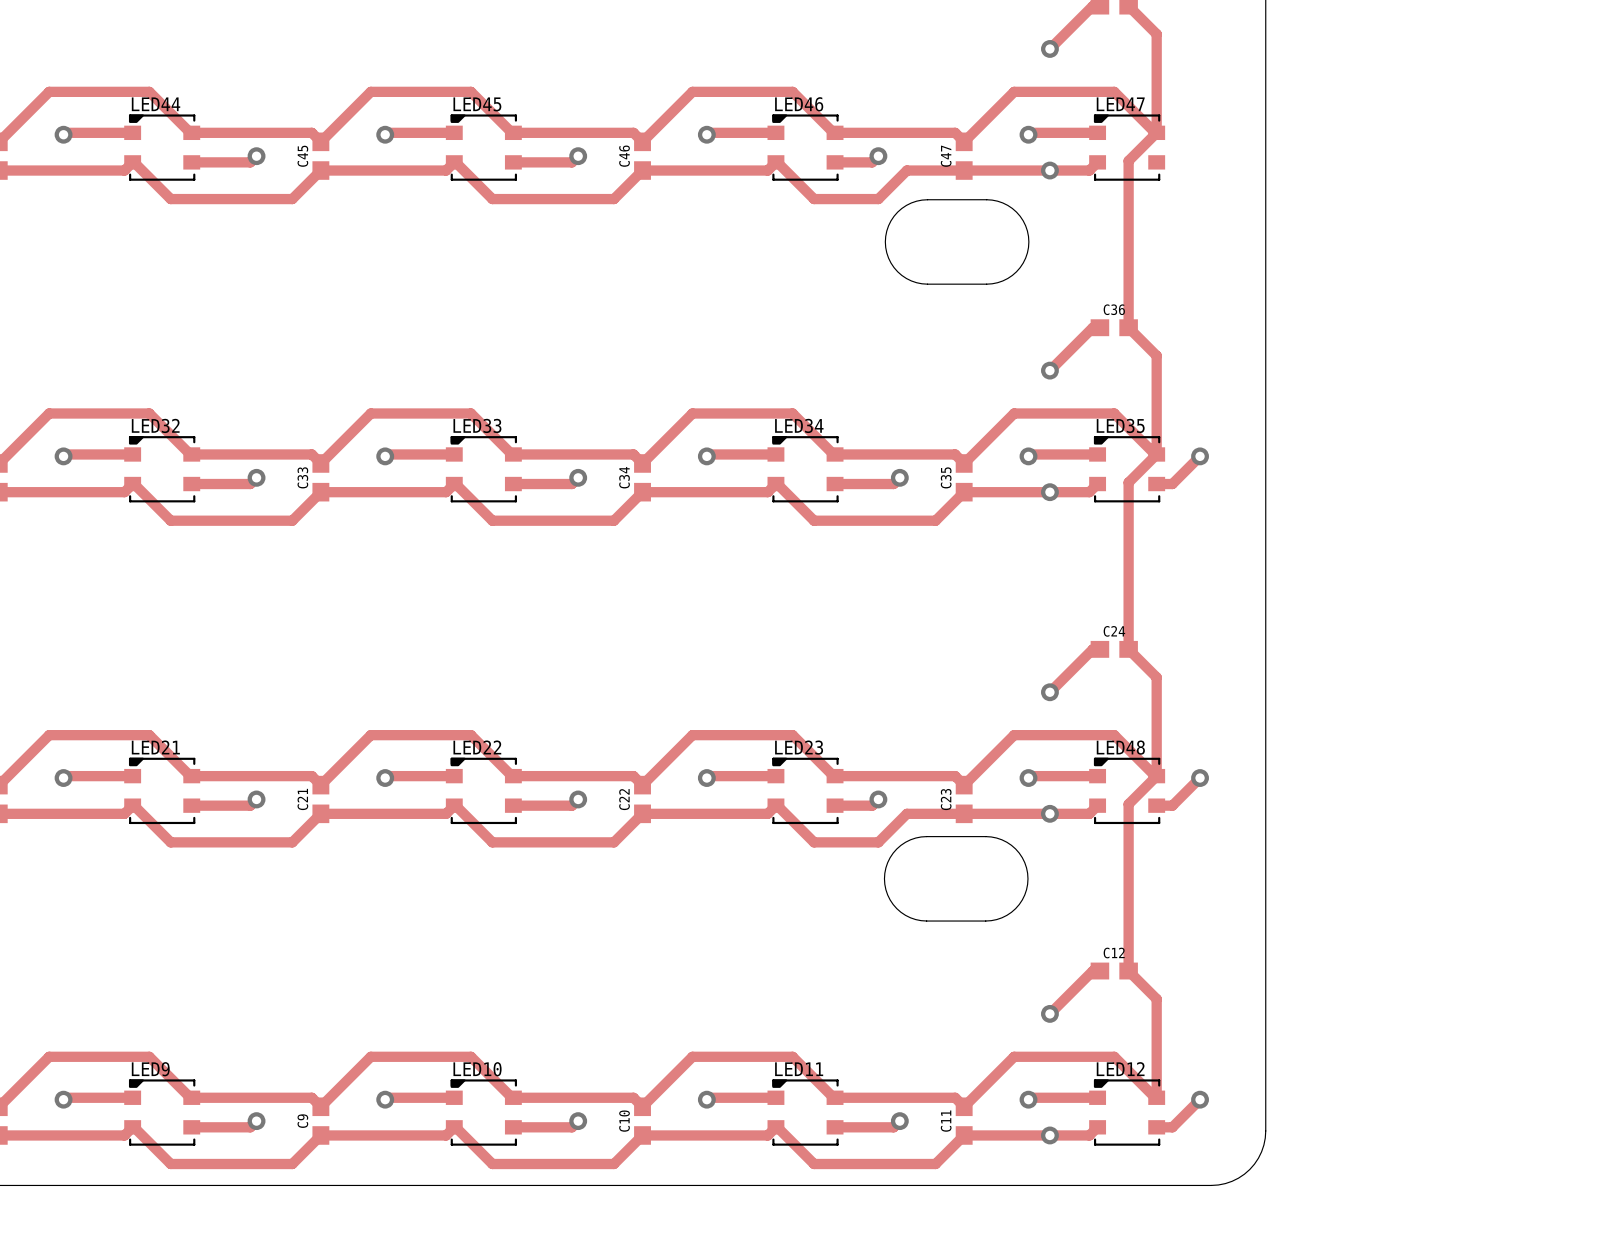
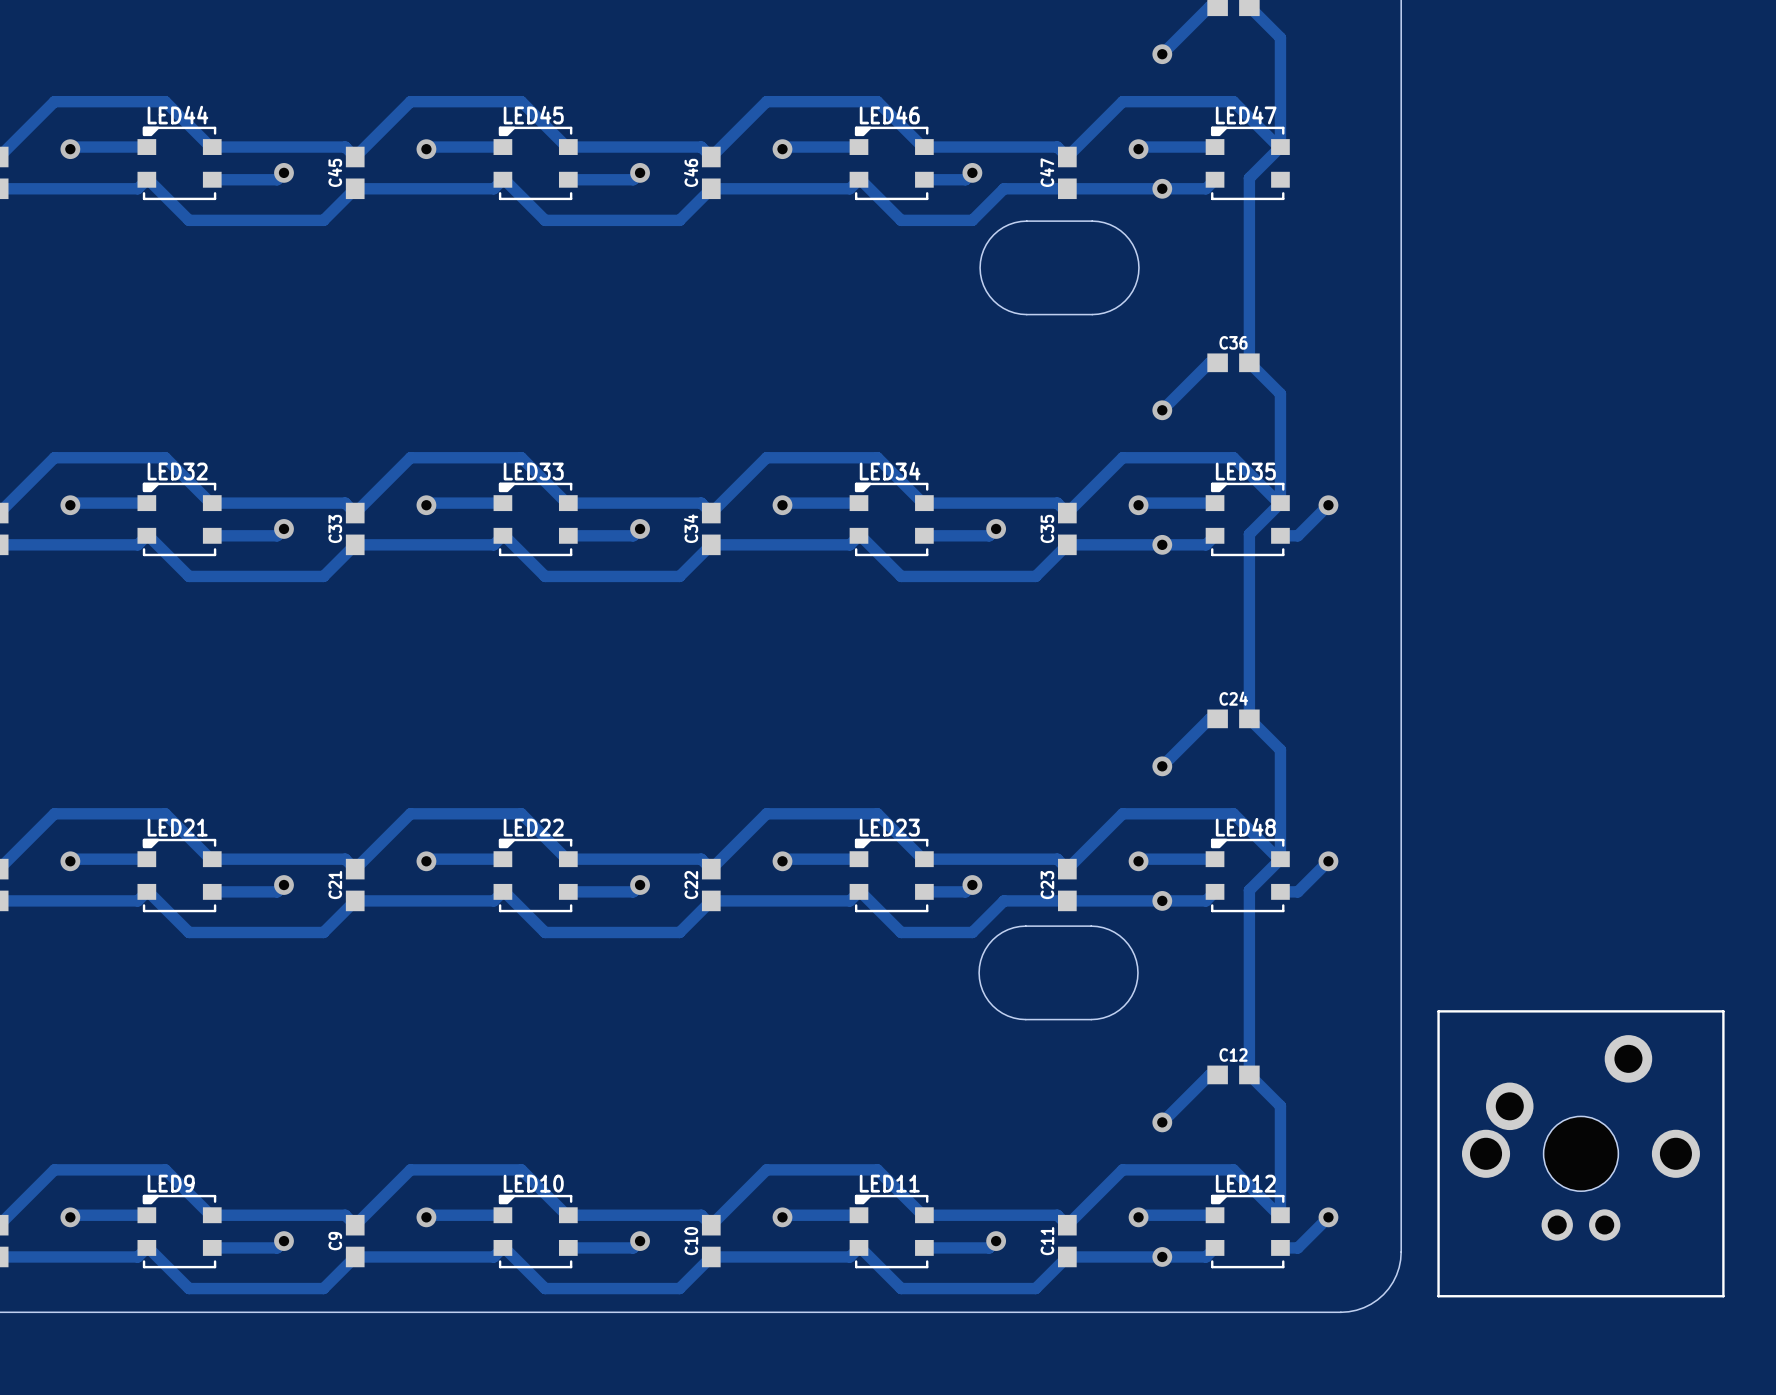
part: none -> (1580, 1153)

